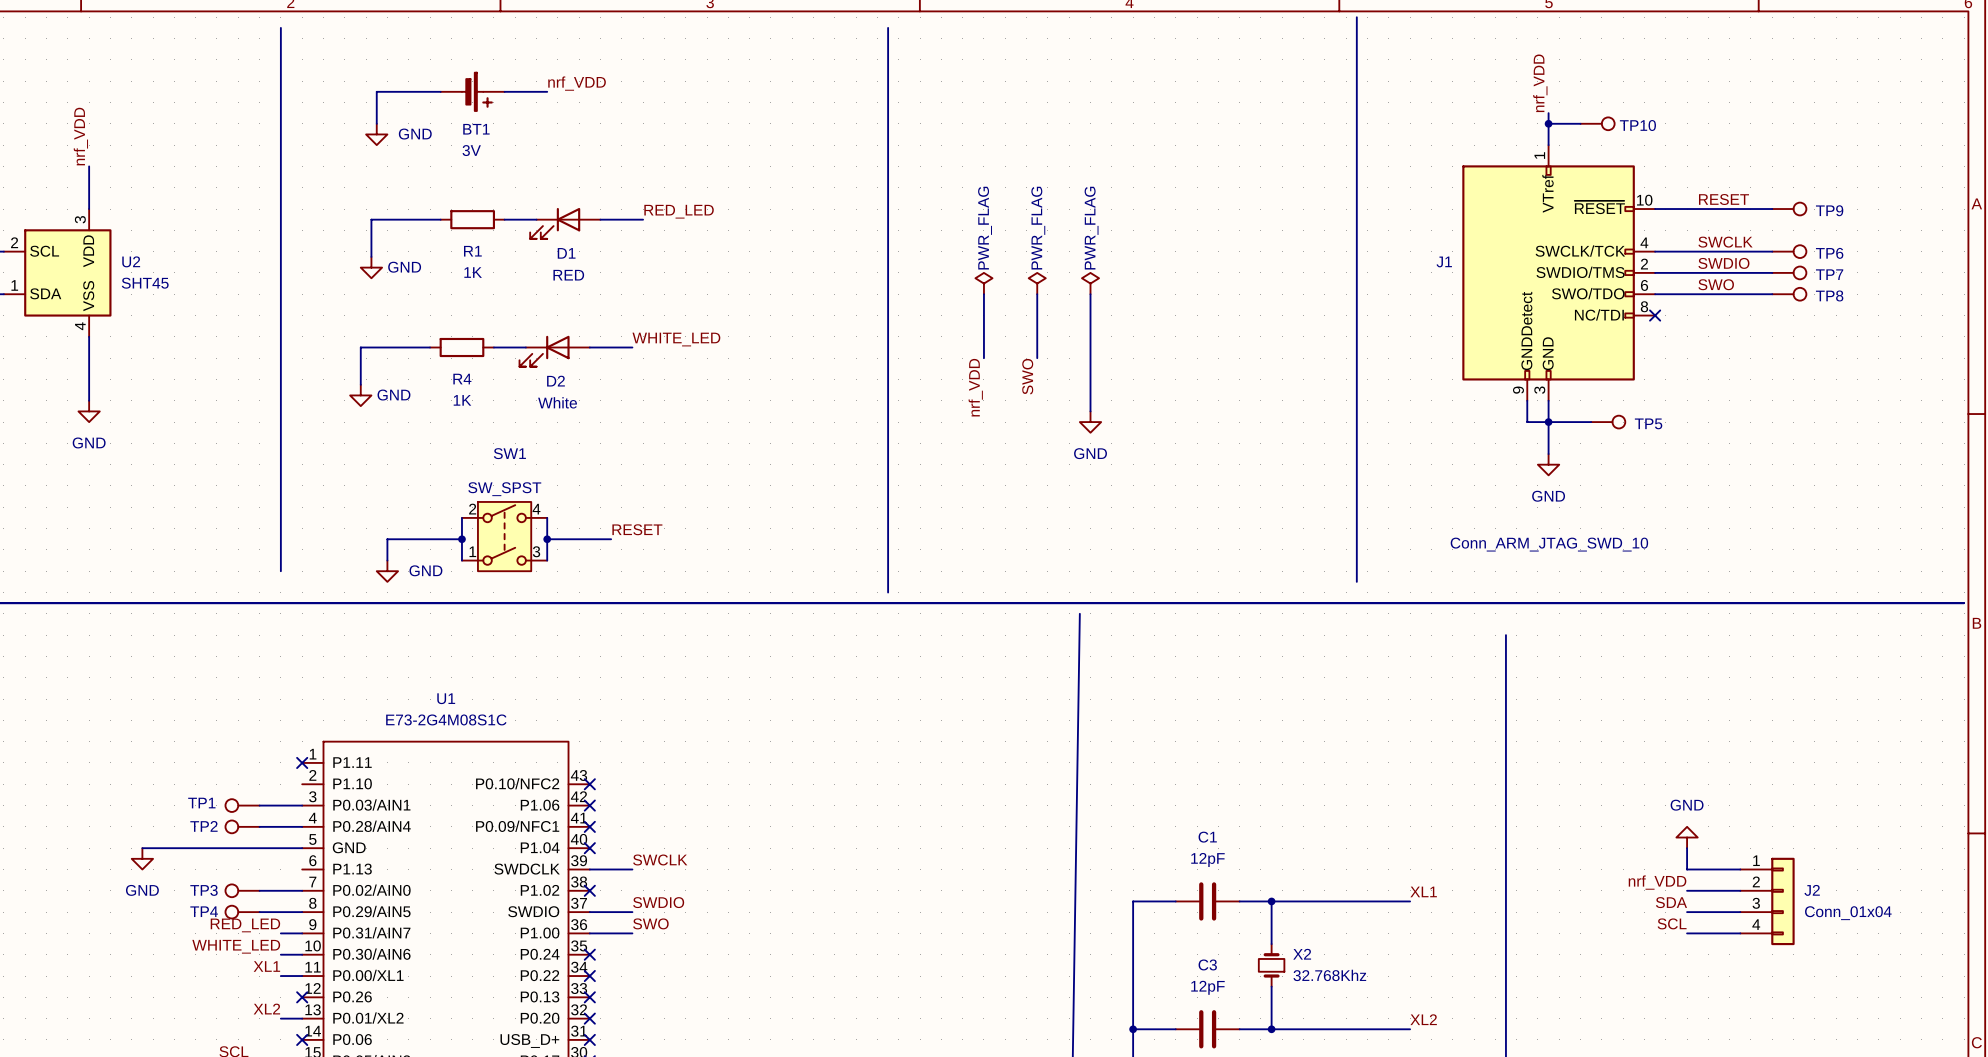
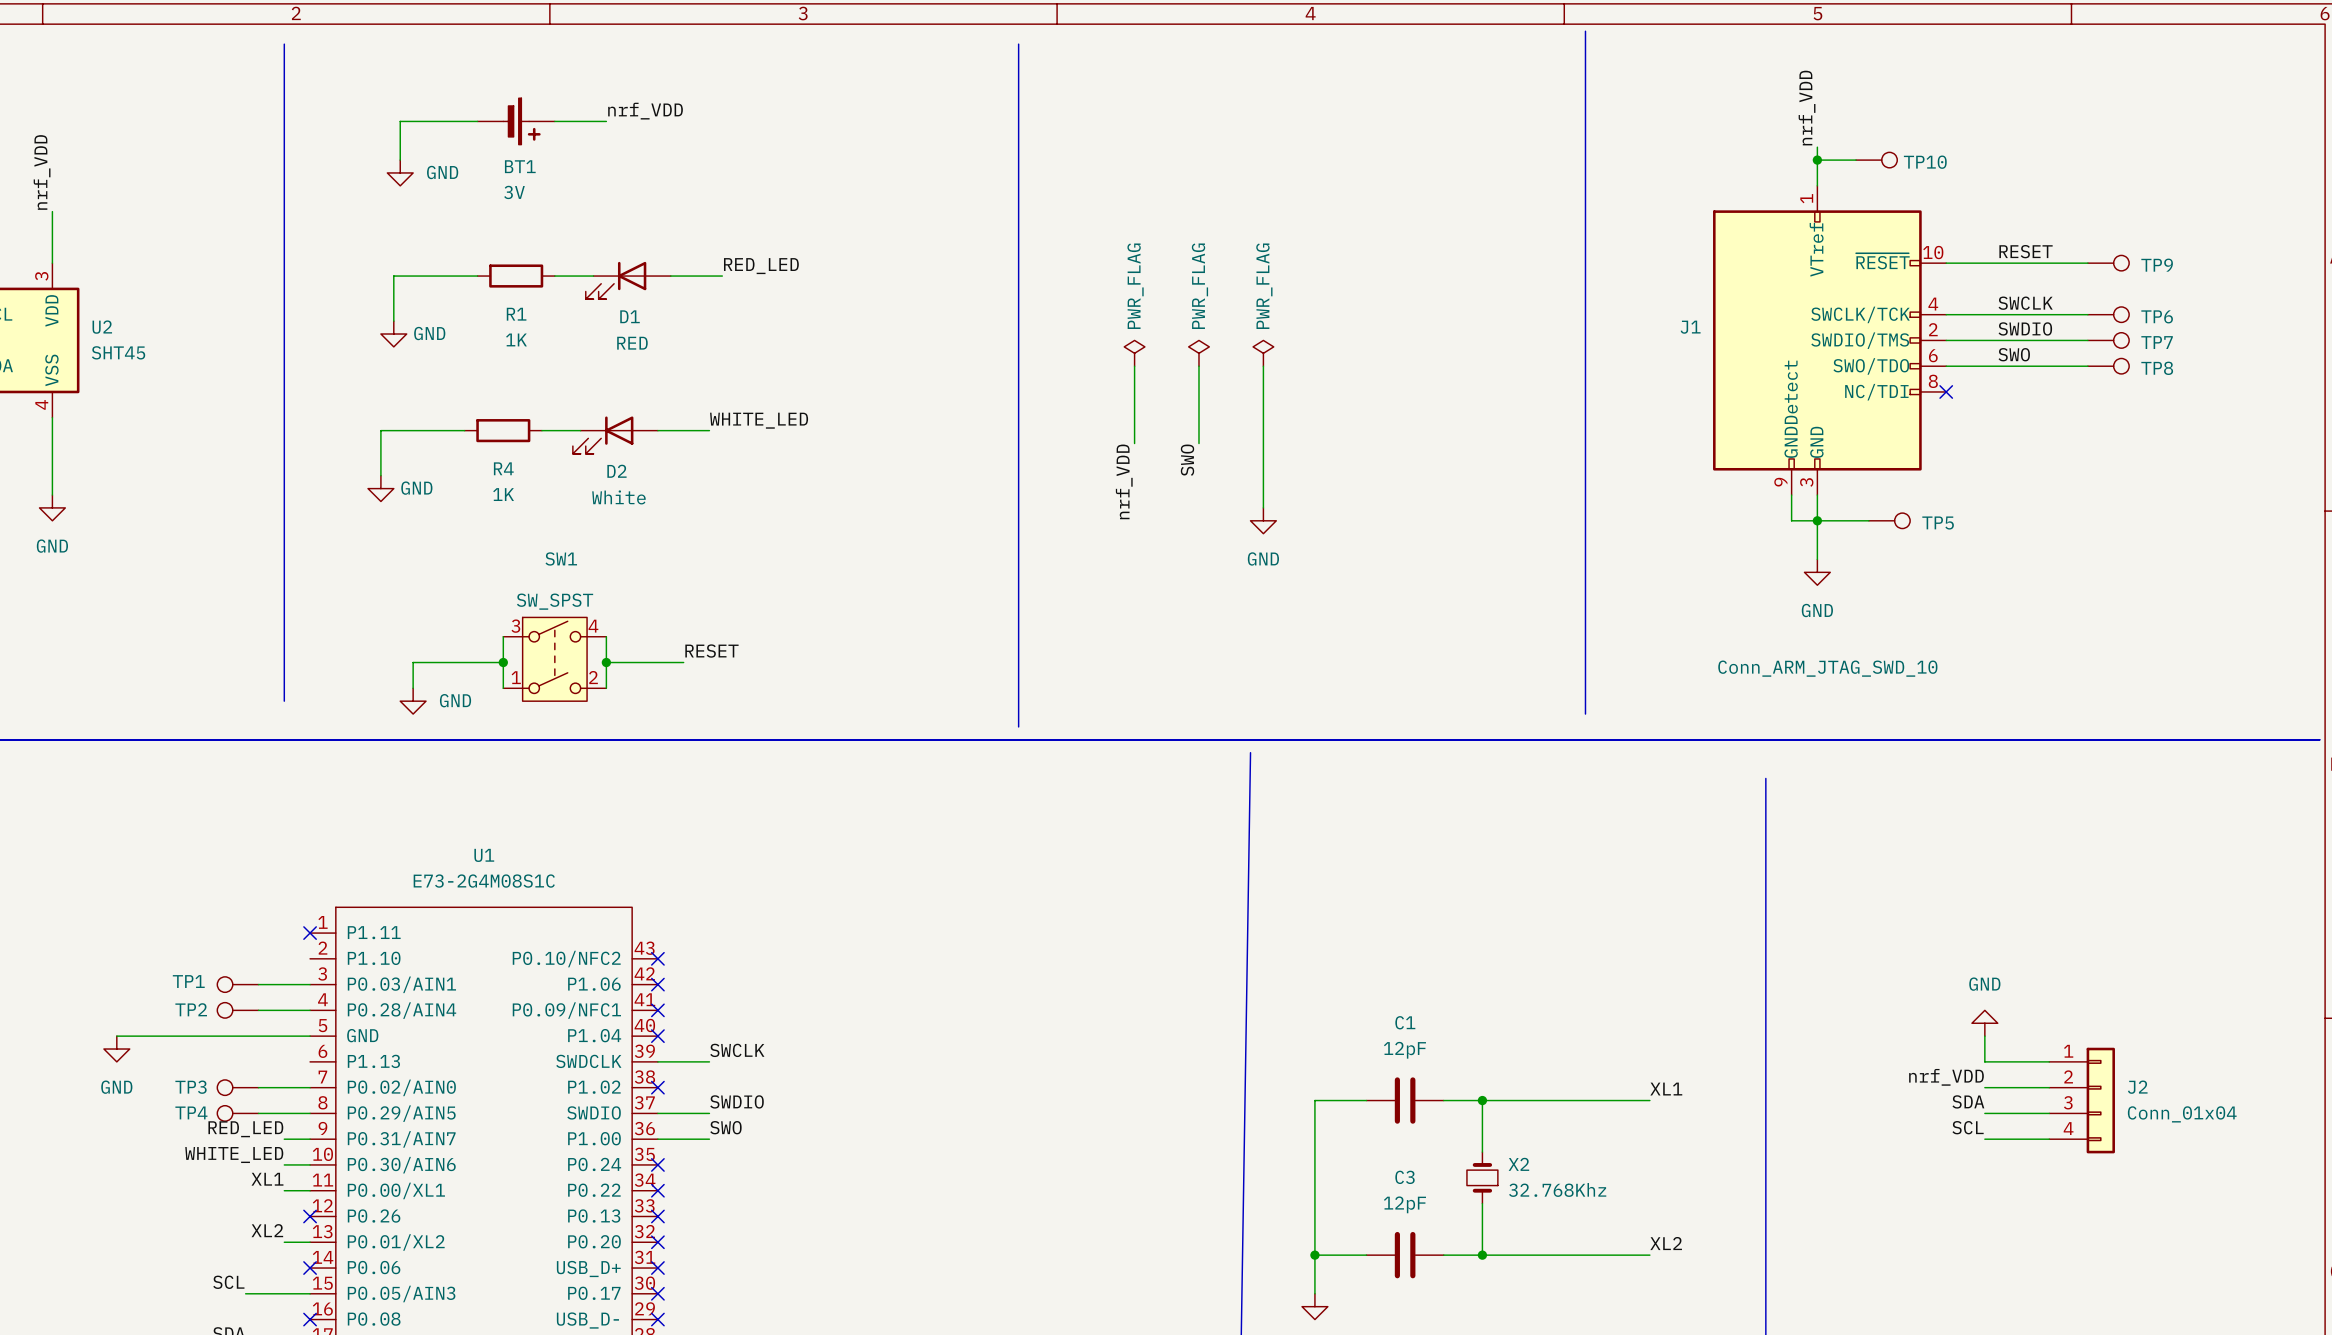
SW1 pin number: 2 (472, 509) -> 3 (515, 626)
SW1 pin number: 3 (536, 551) -> 2 (593, 677)

